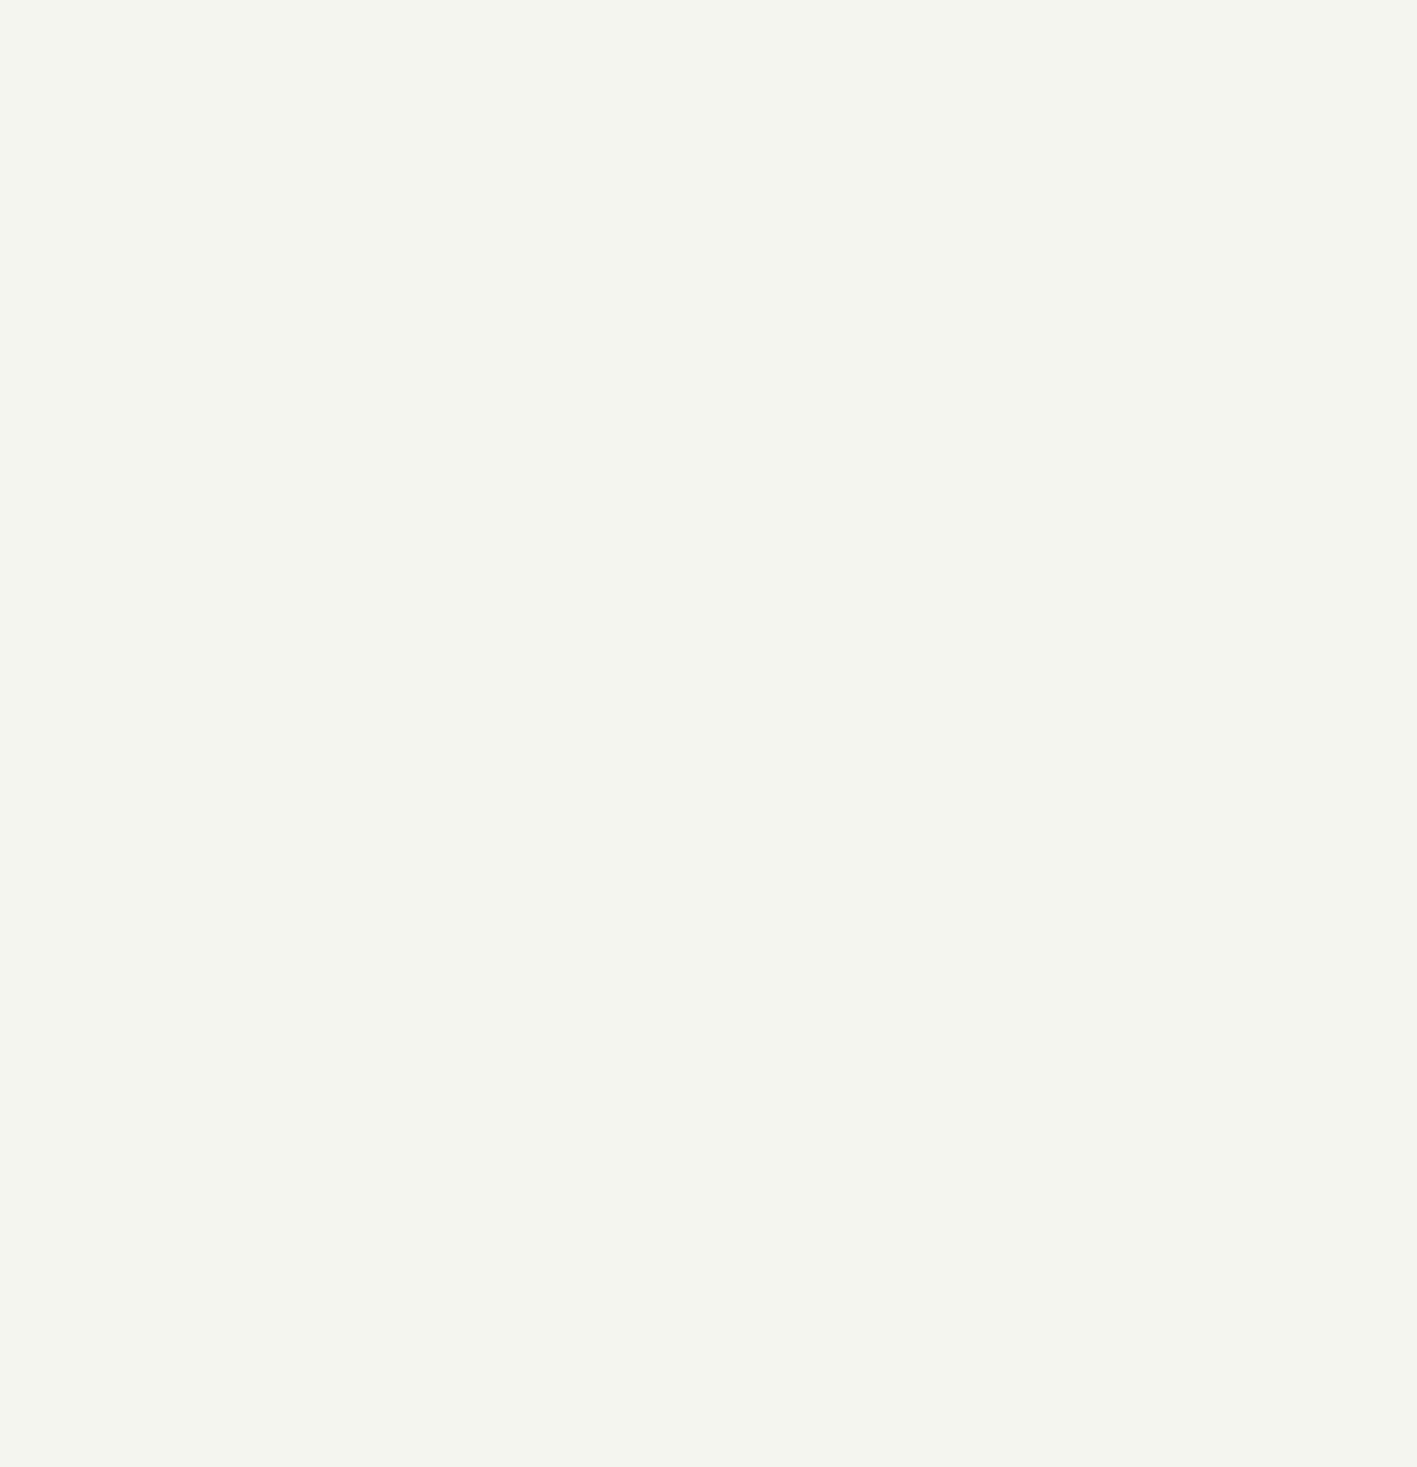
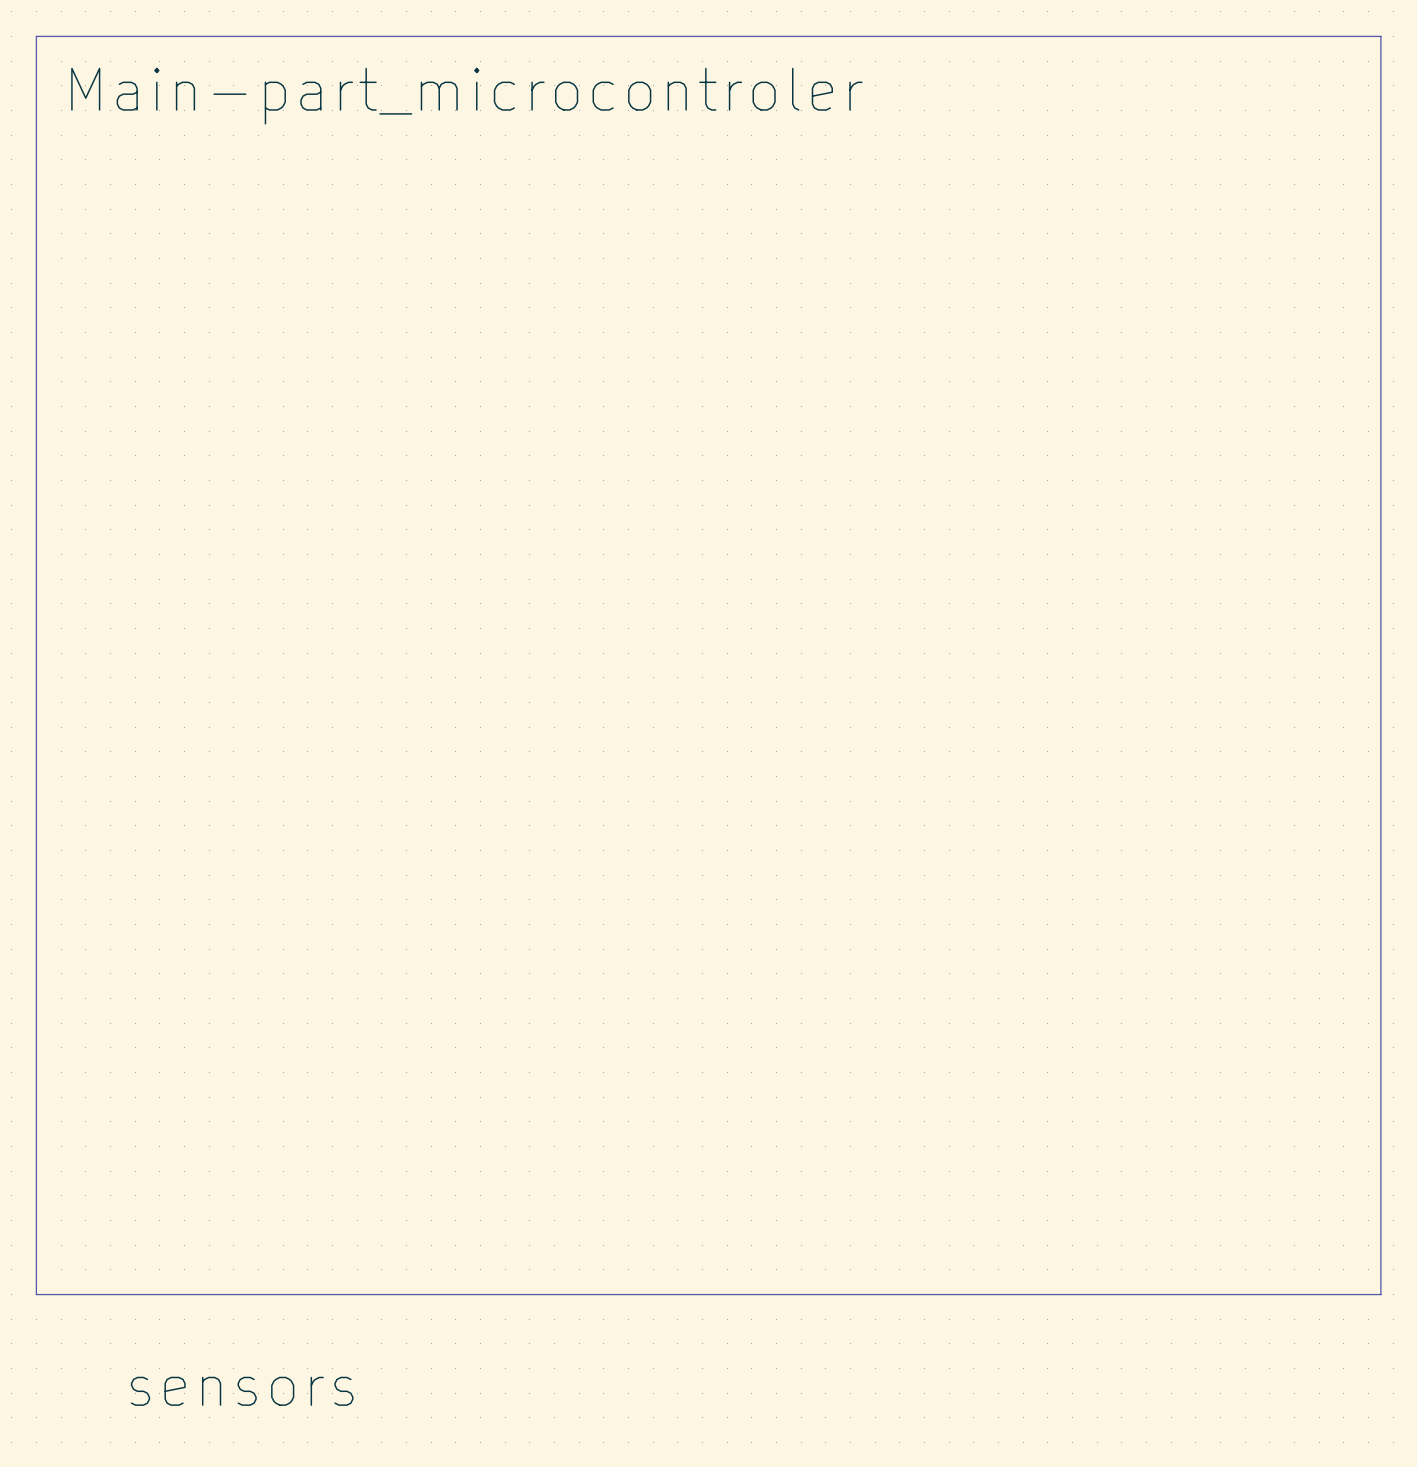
line: none -> (36, 36) (1380, 36) (1380, 1294) (36, 1294) (36, 36)
label: none -> Main-part_microcontroler (466, 96)
label: none -> sensors (242, 1391)

